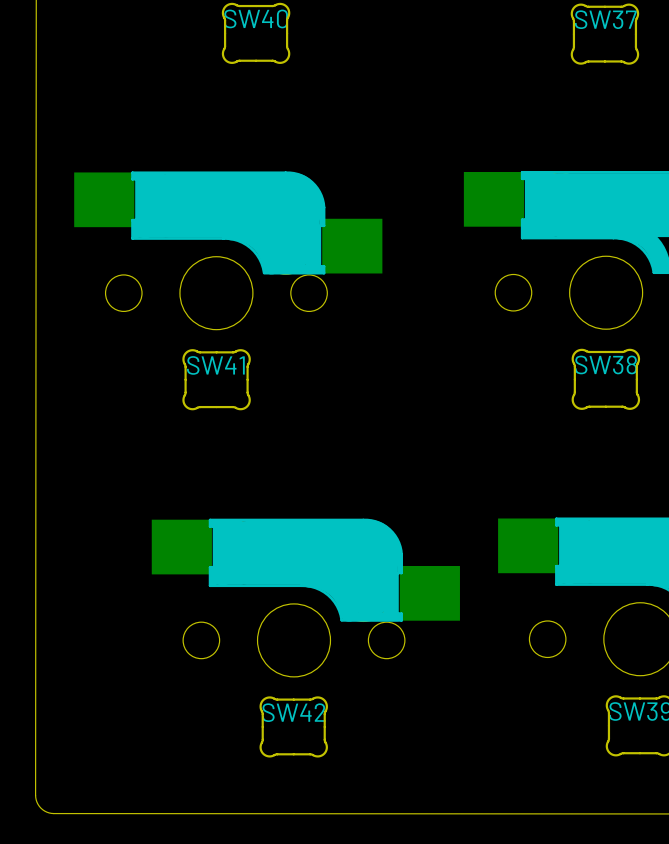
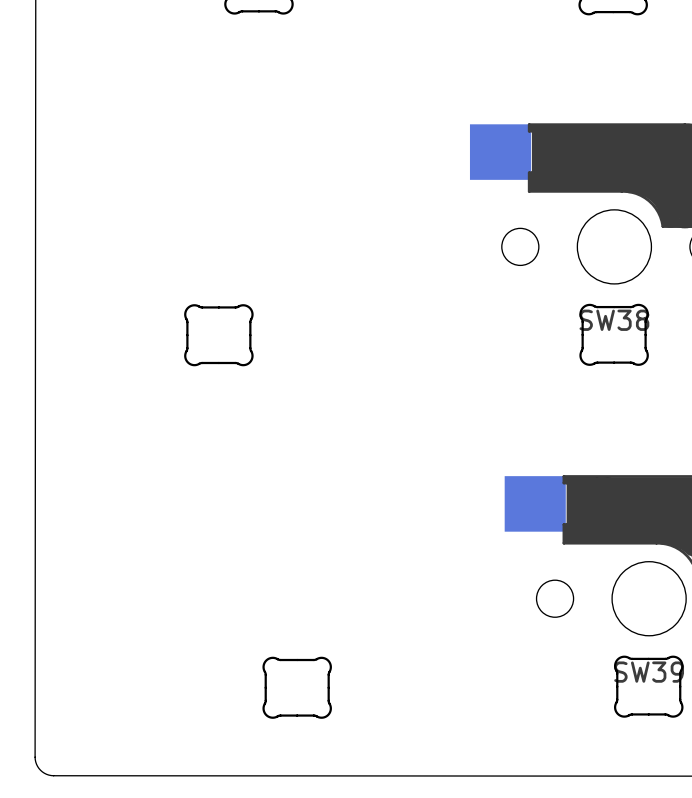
SW41: (228, 250) -> none
SW42: (305, 597) -> none

